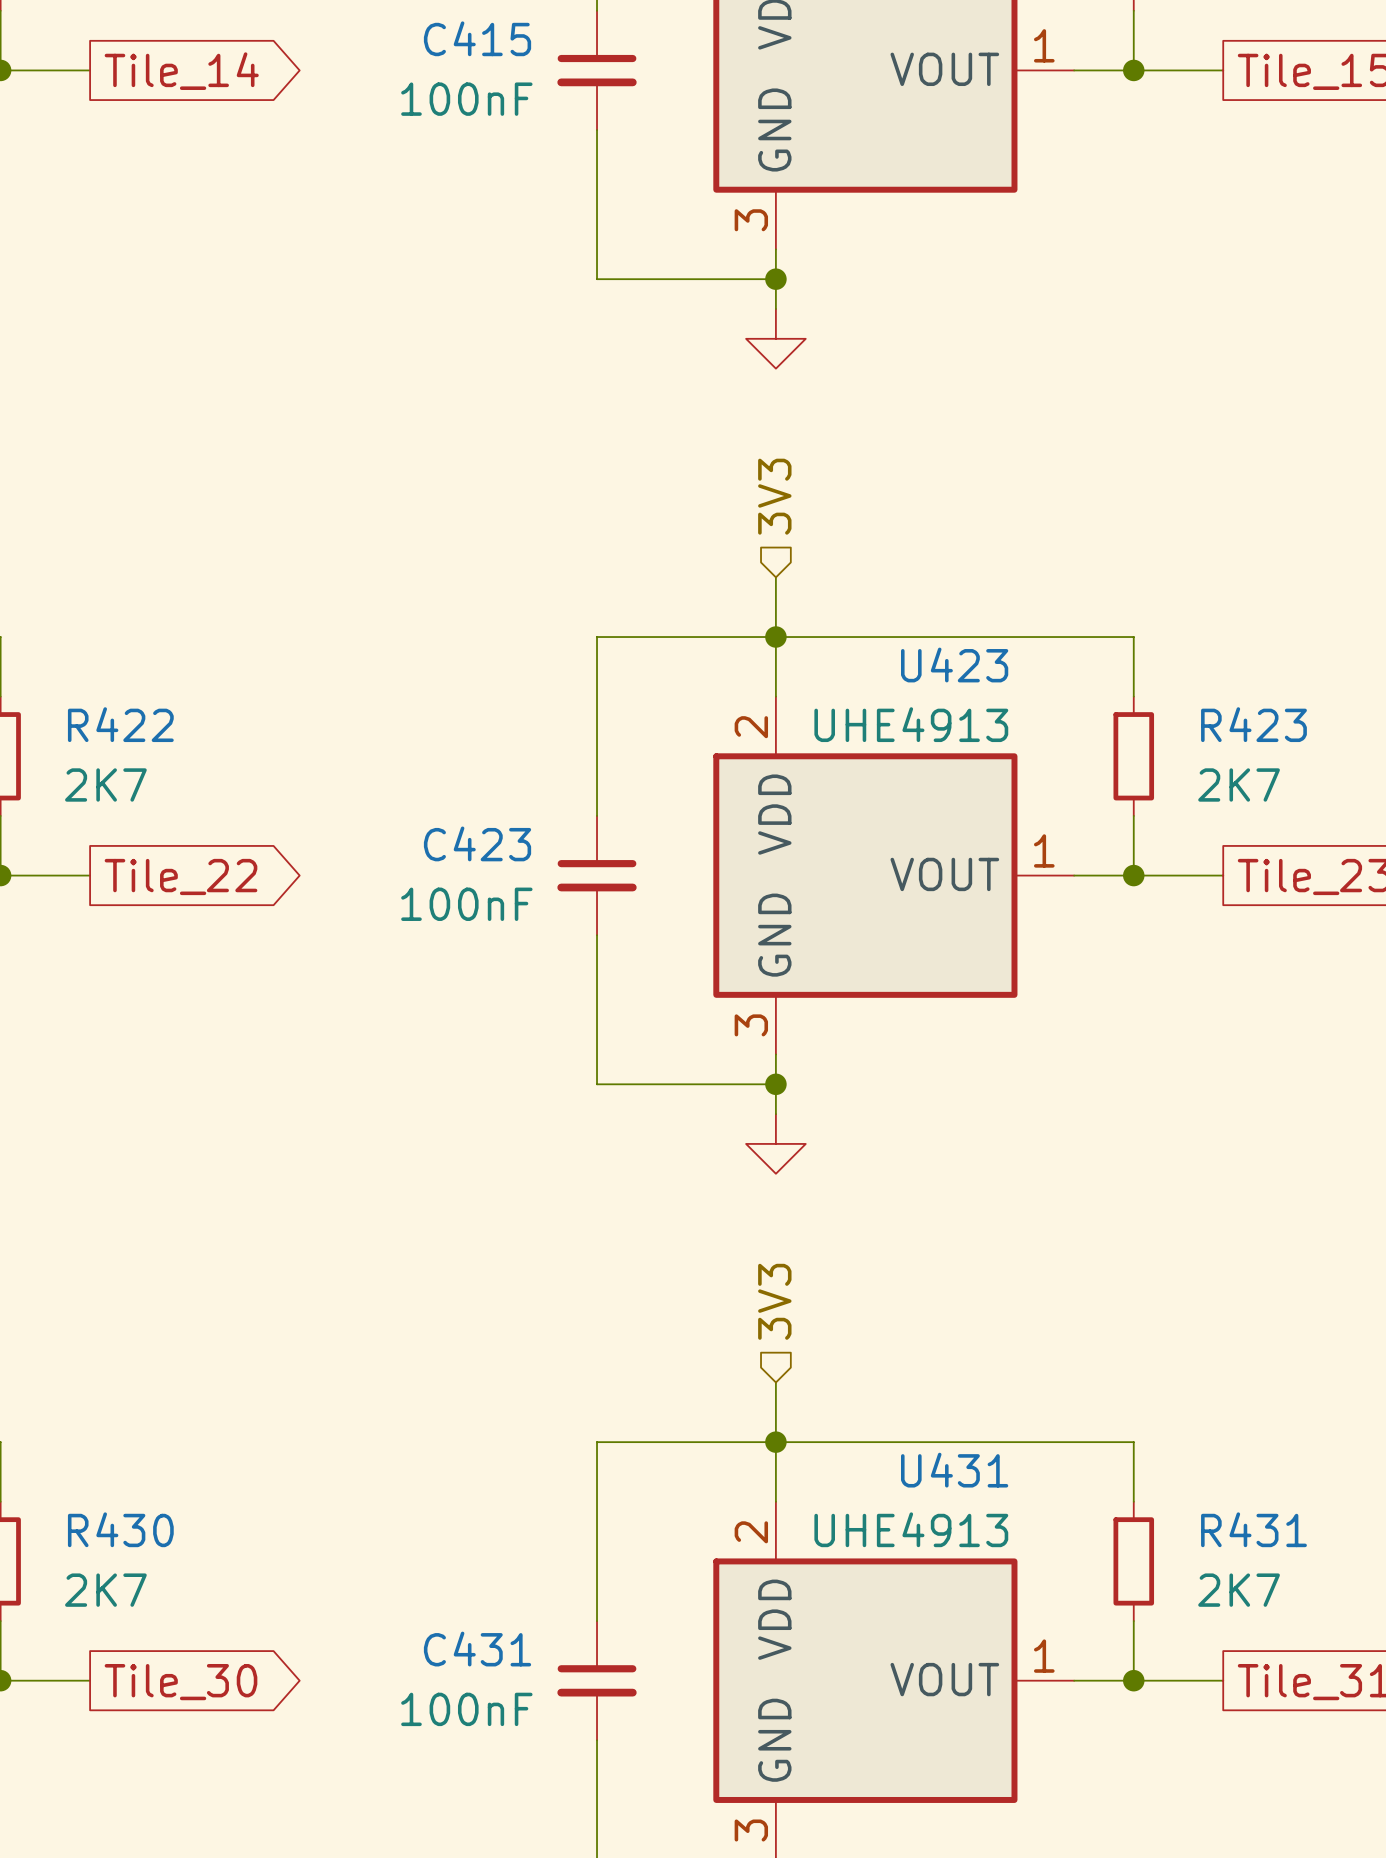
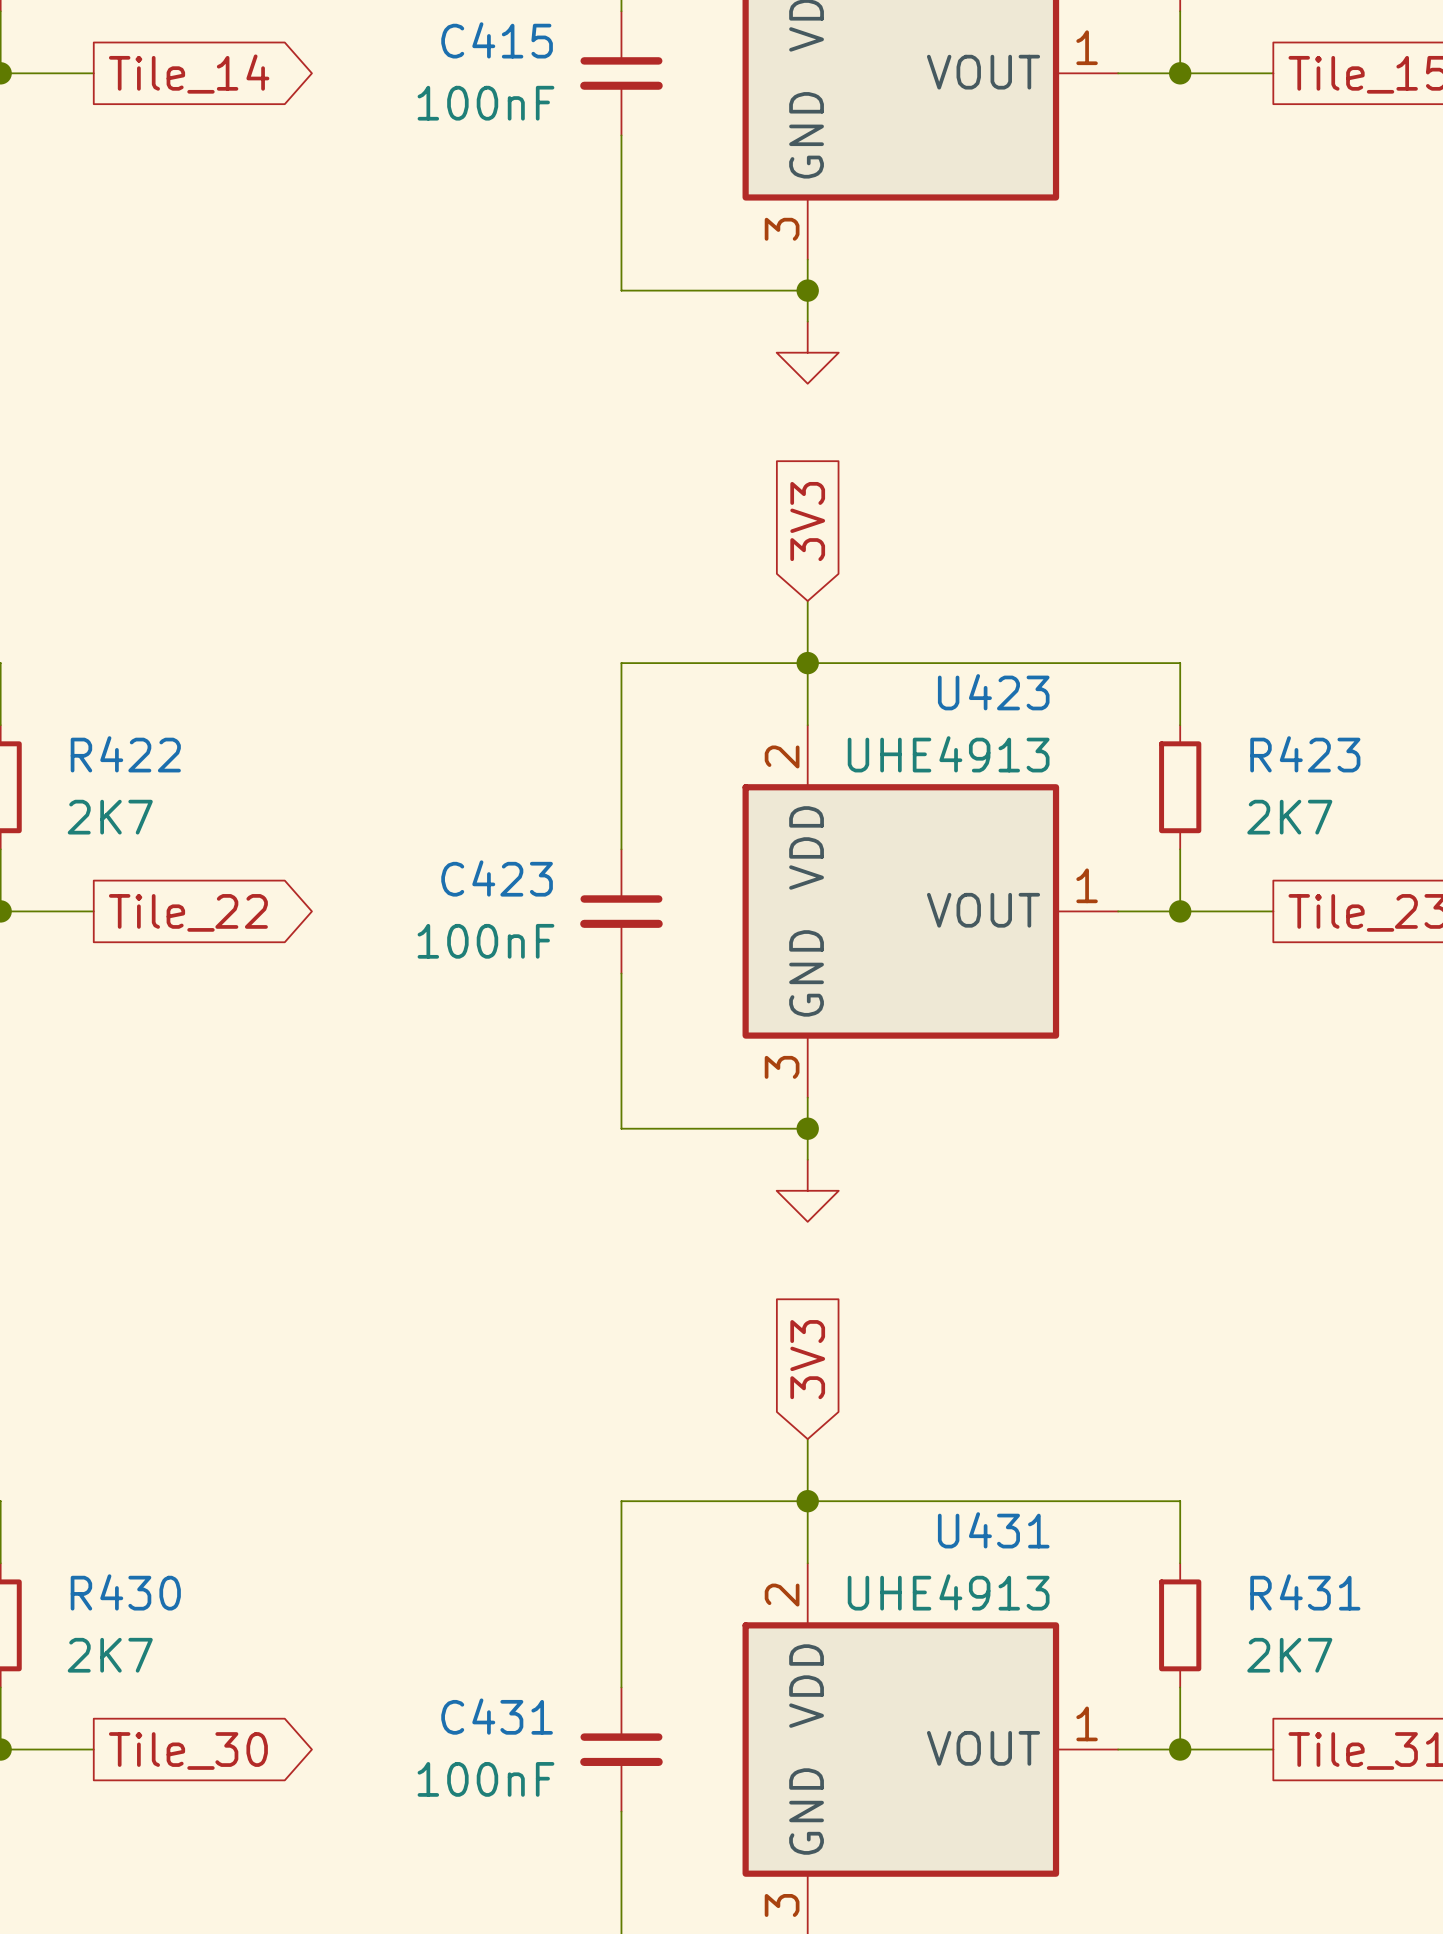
hierarchical label: 3V3 (774, 496) -> none
global label: none -> 3V3 (807, 521)
hierarchical label: 3V3 (774, 1301) -> none
global label: none -> 3V3 (807, 1359)

